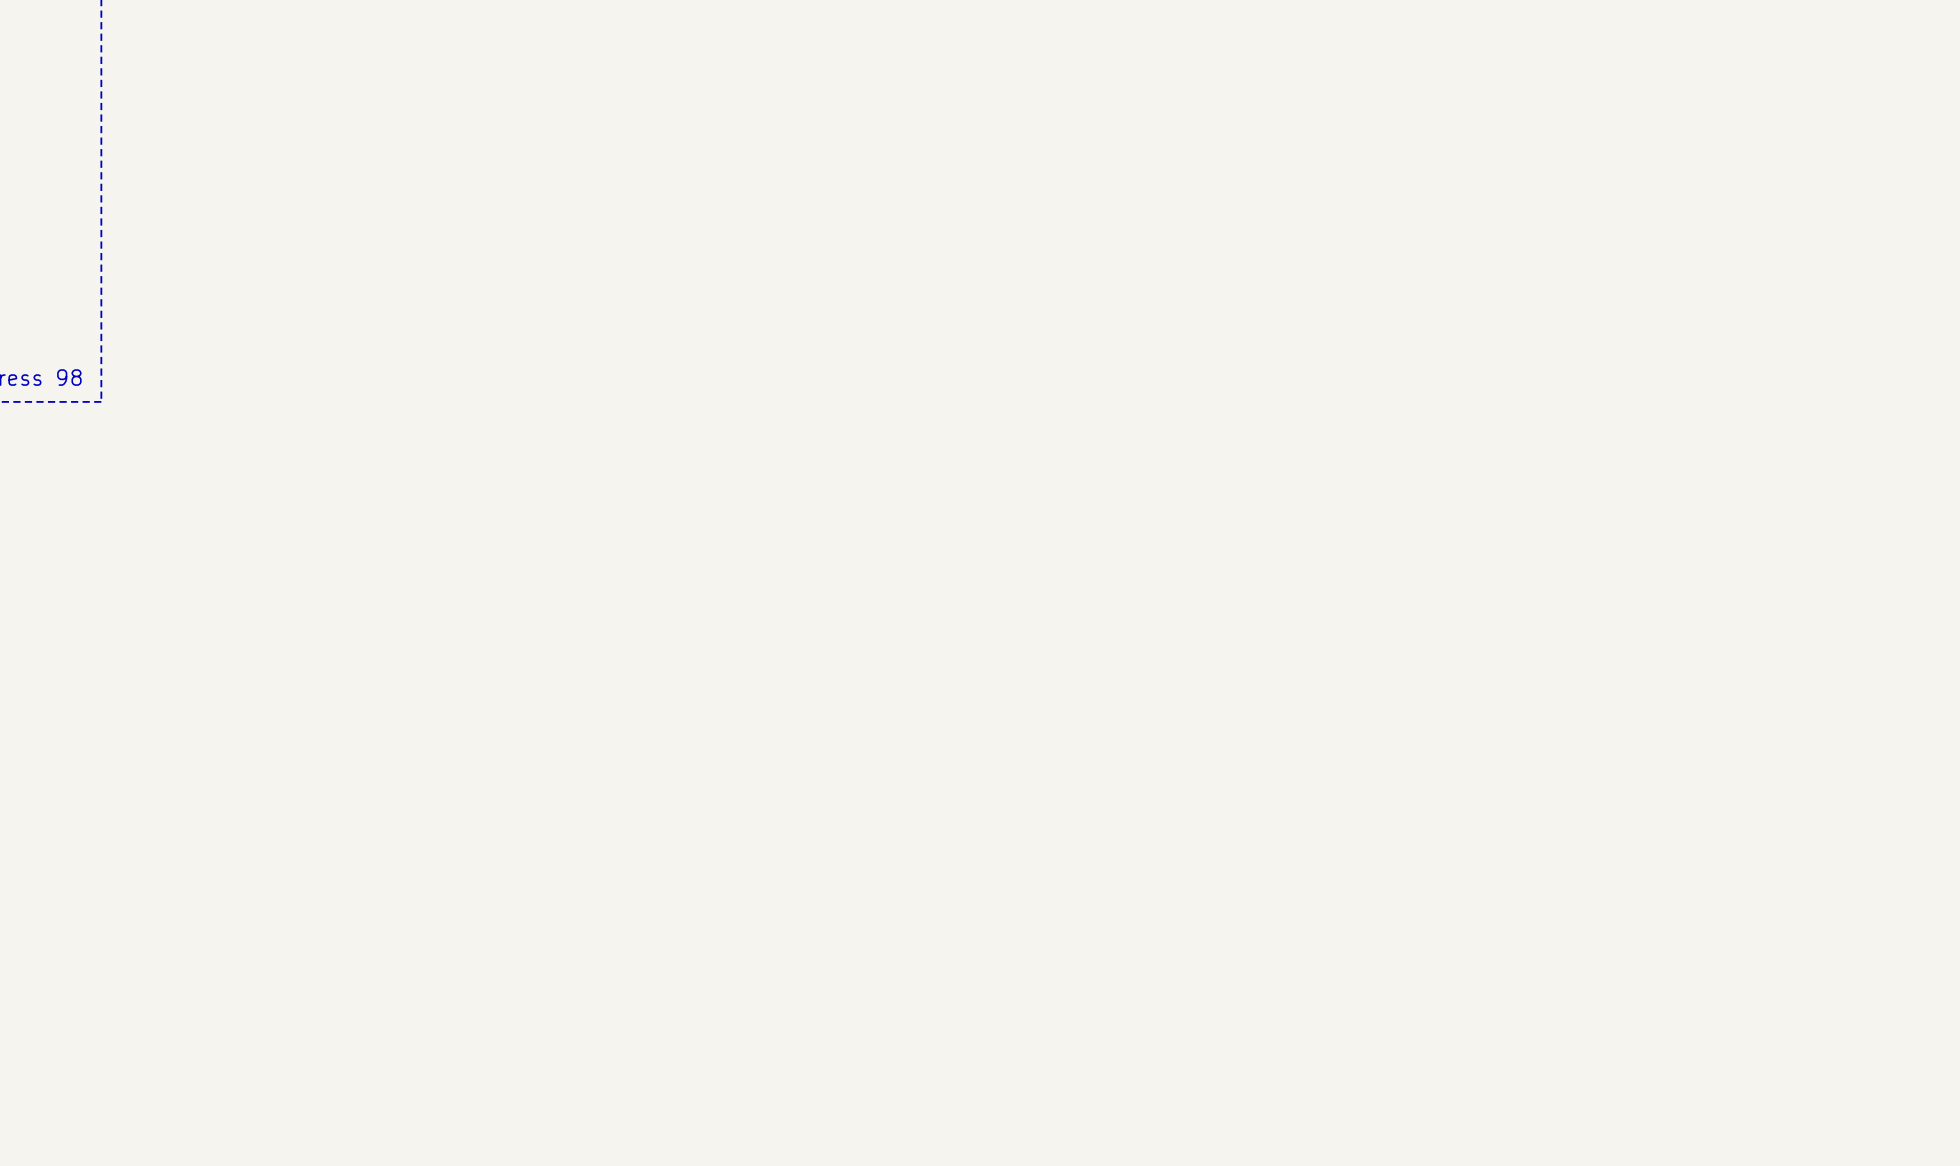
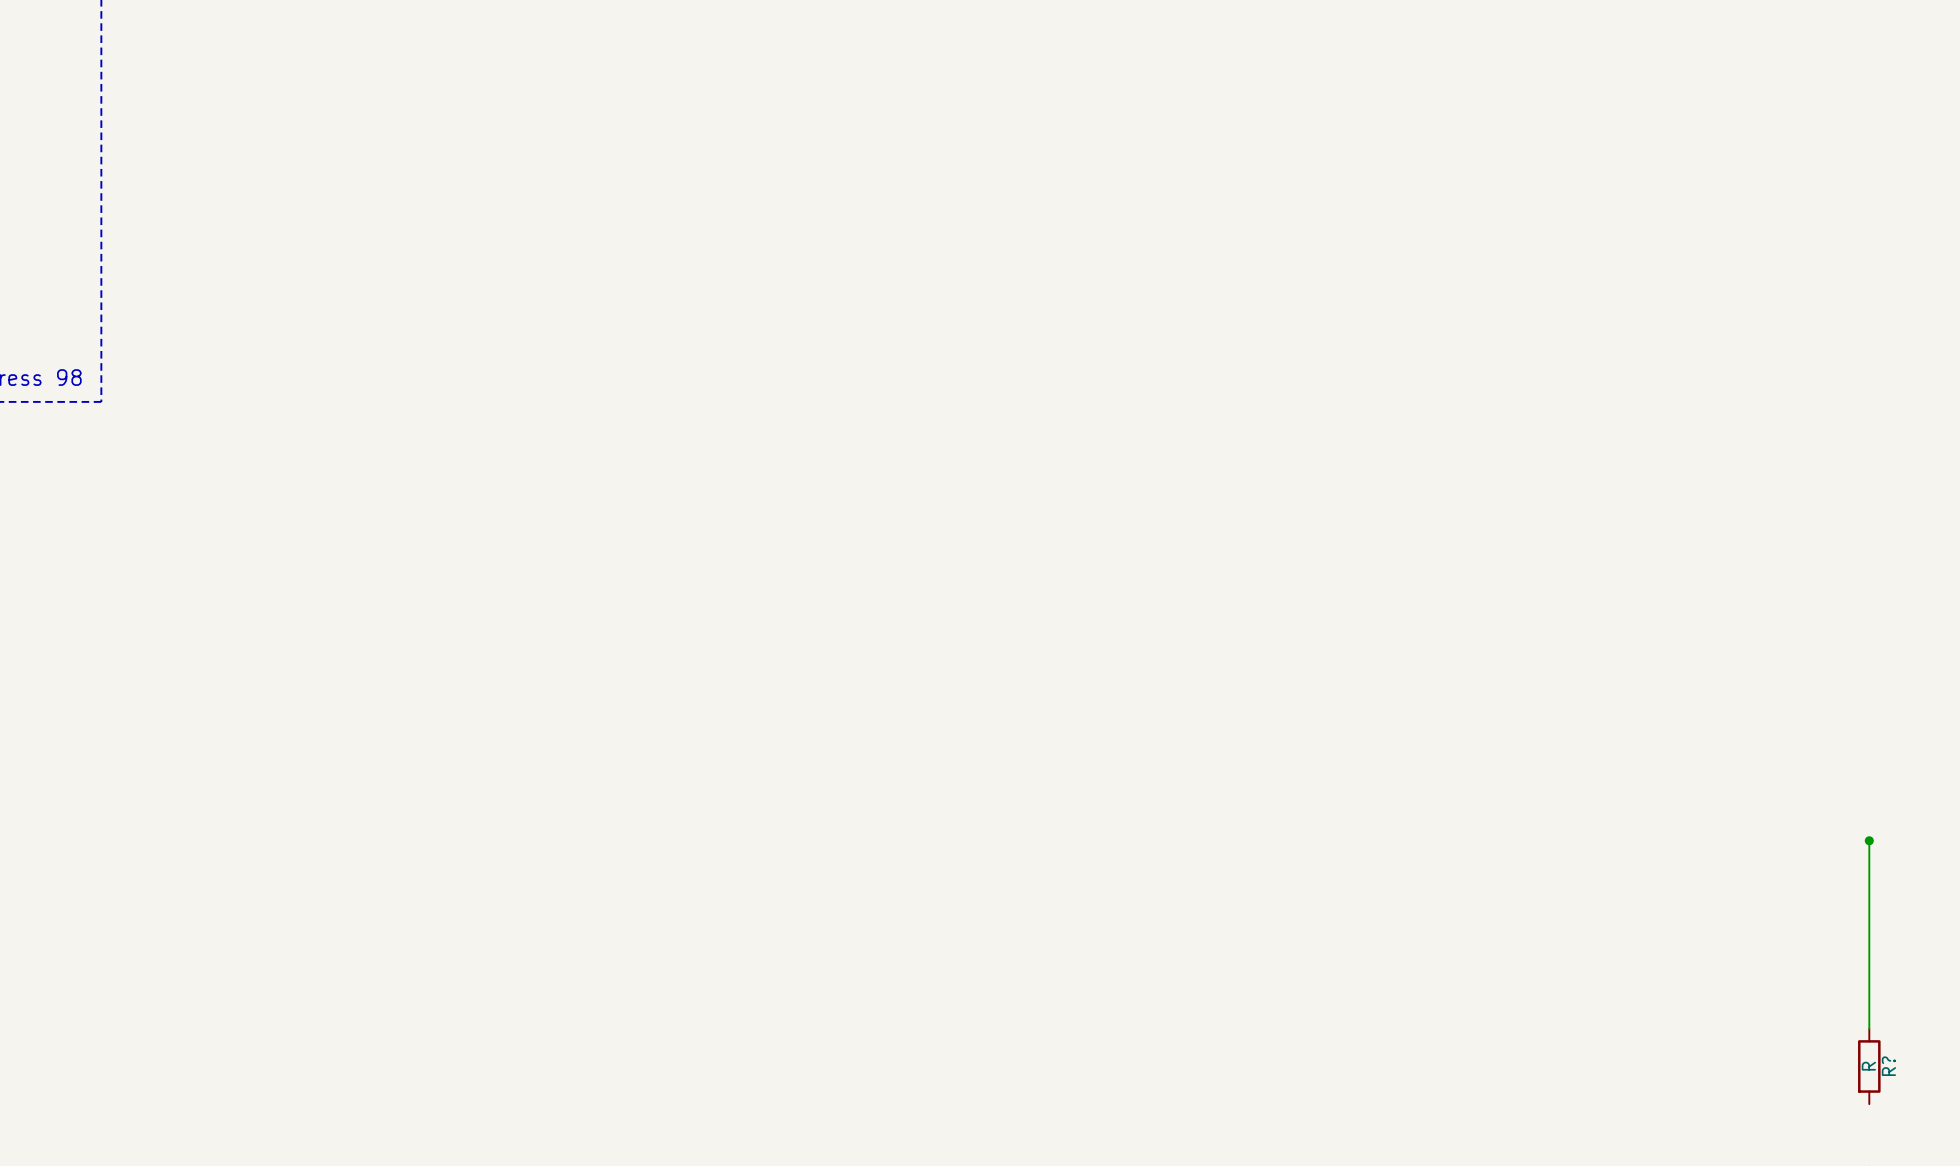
wire: none -> (1869, 840) (1869, 1028)
junction: none -> (1869, 840)
R?: none -> R (1869, 1066)

